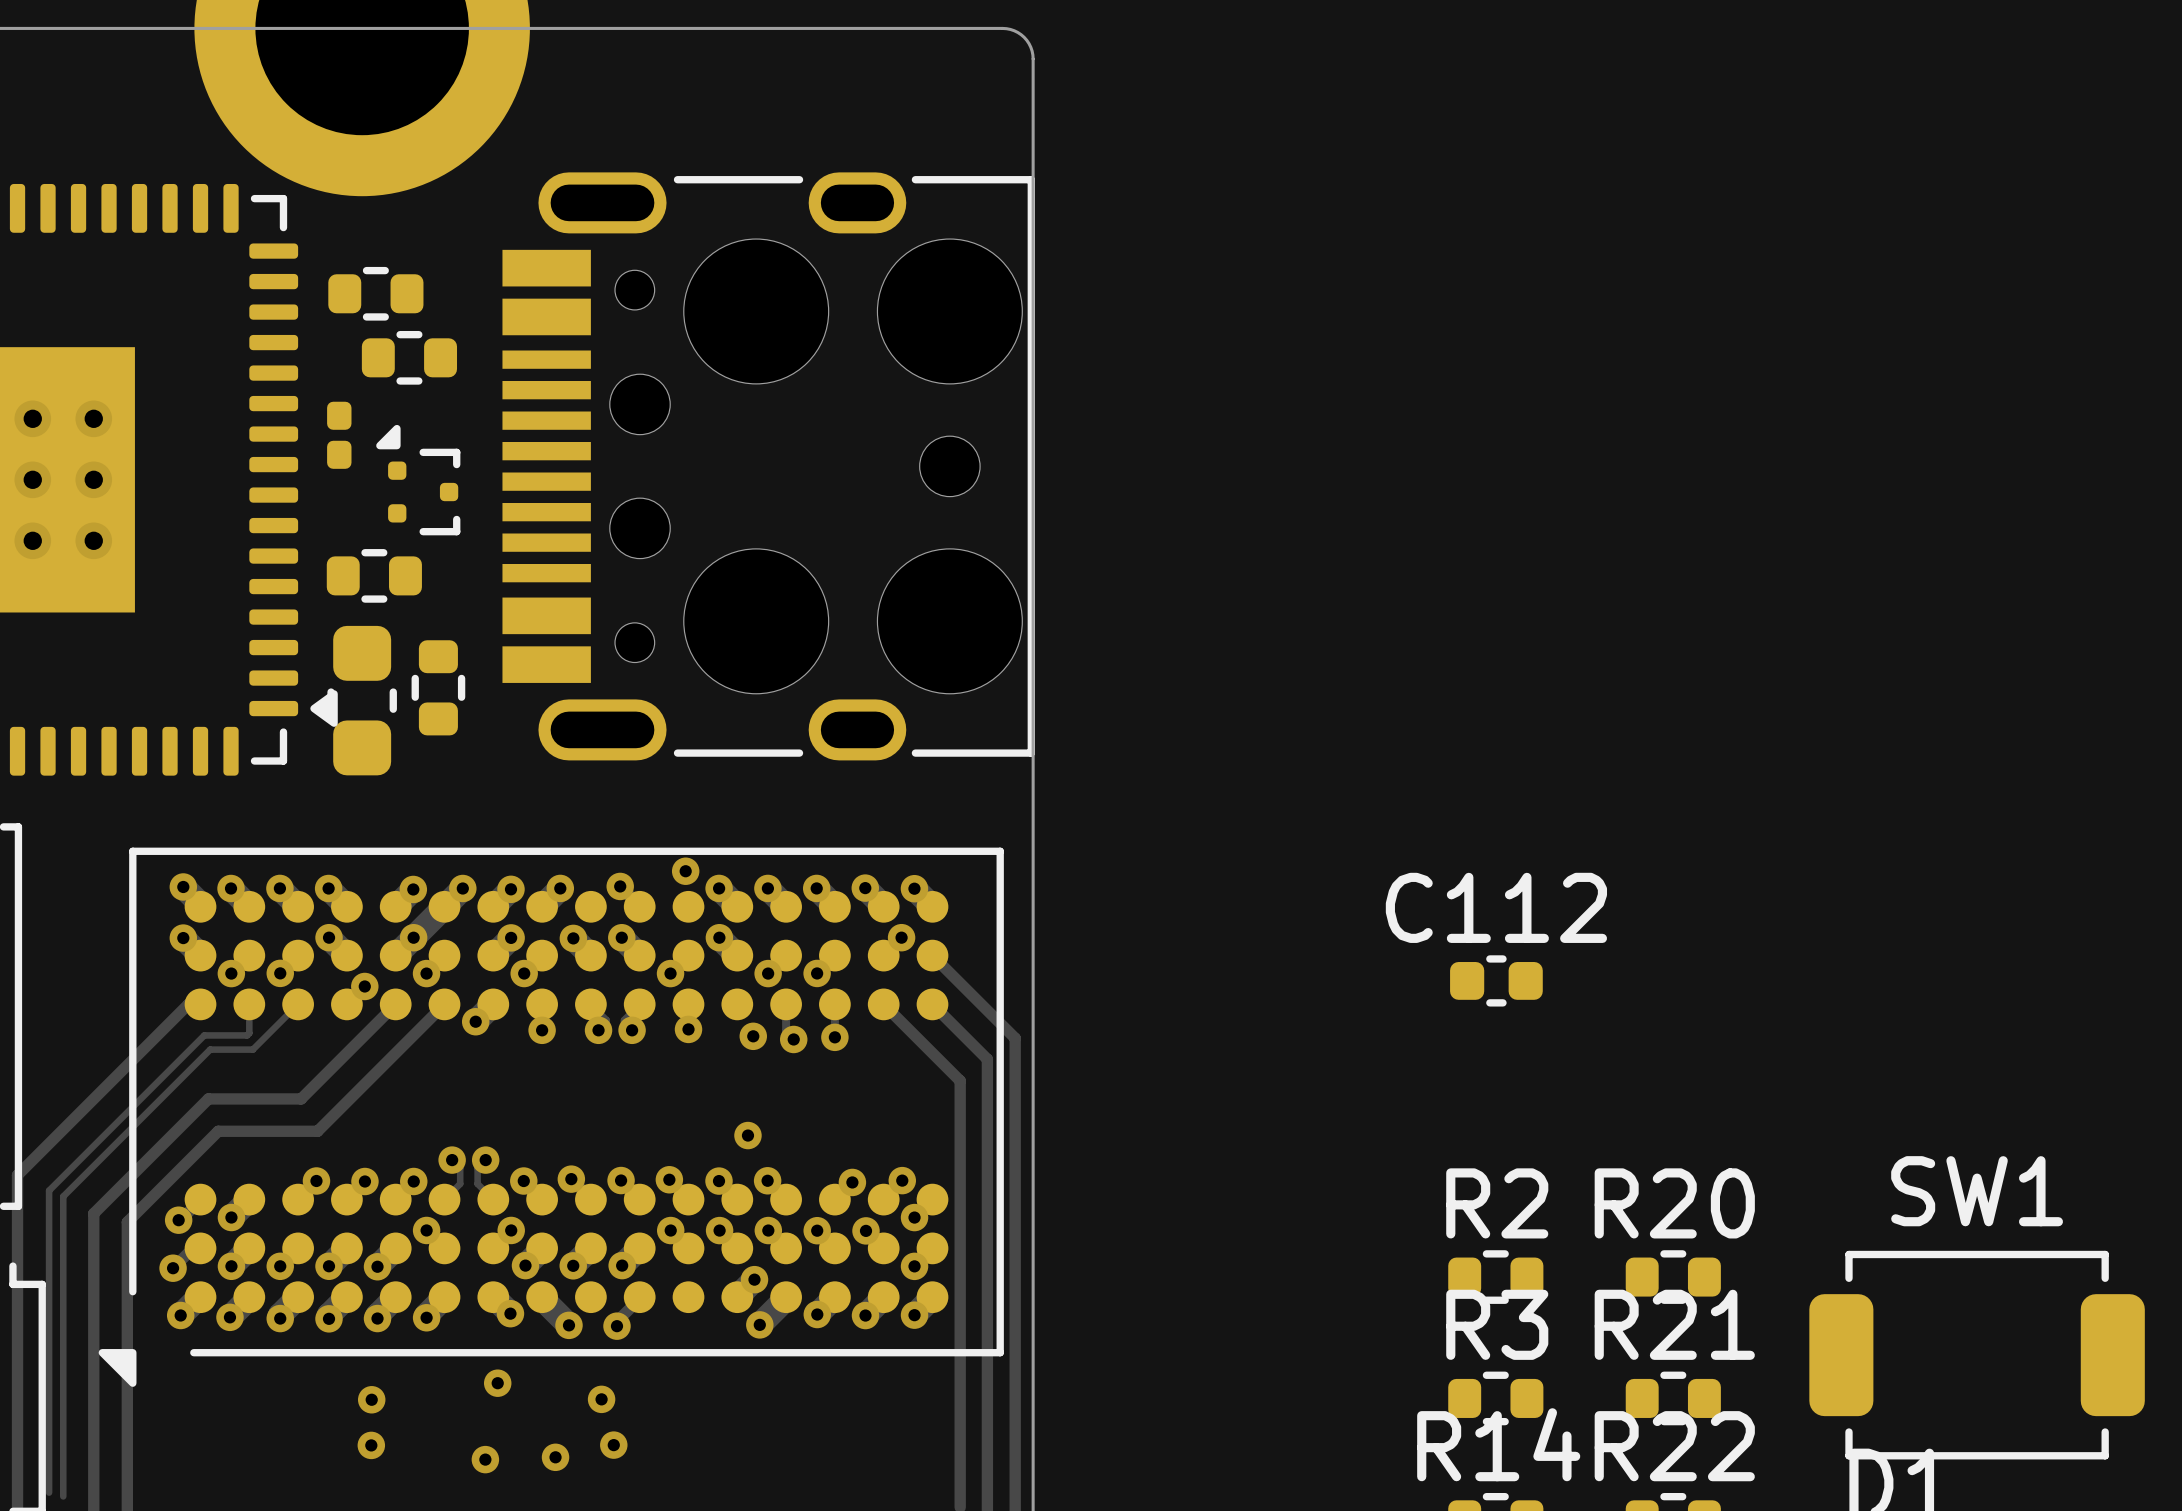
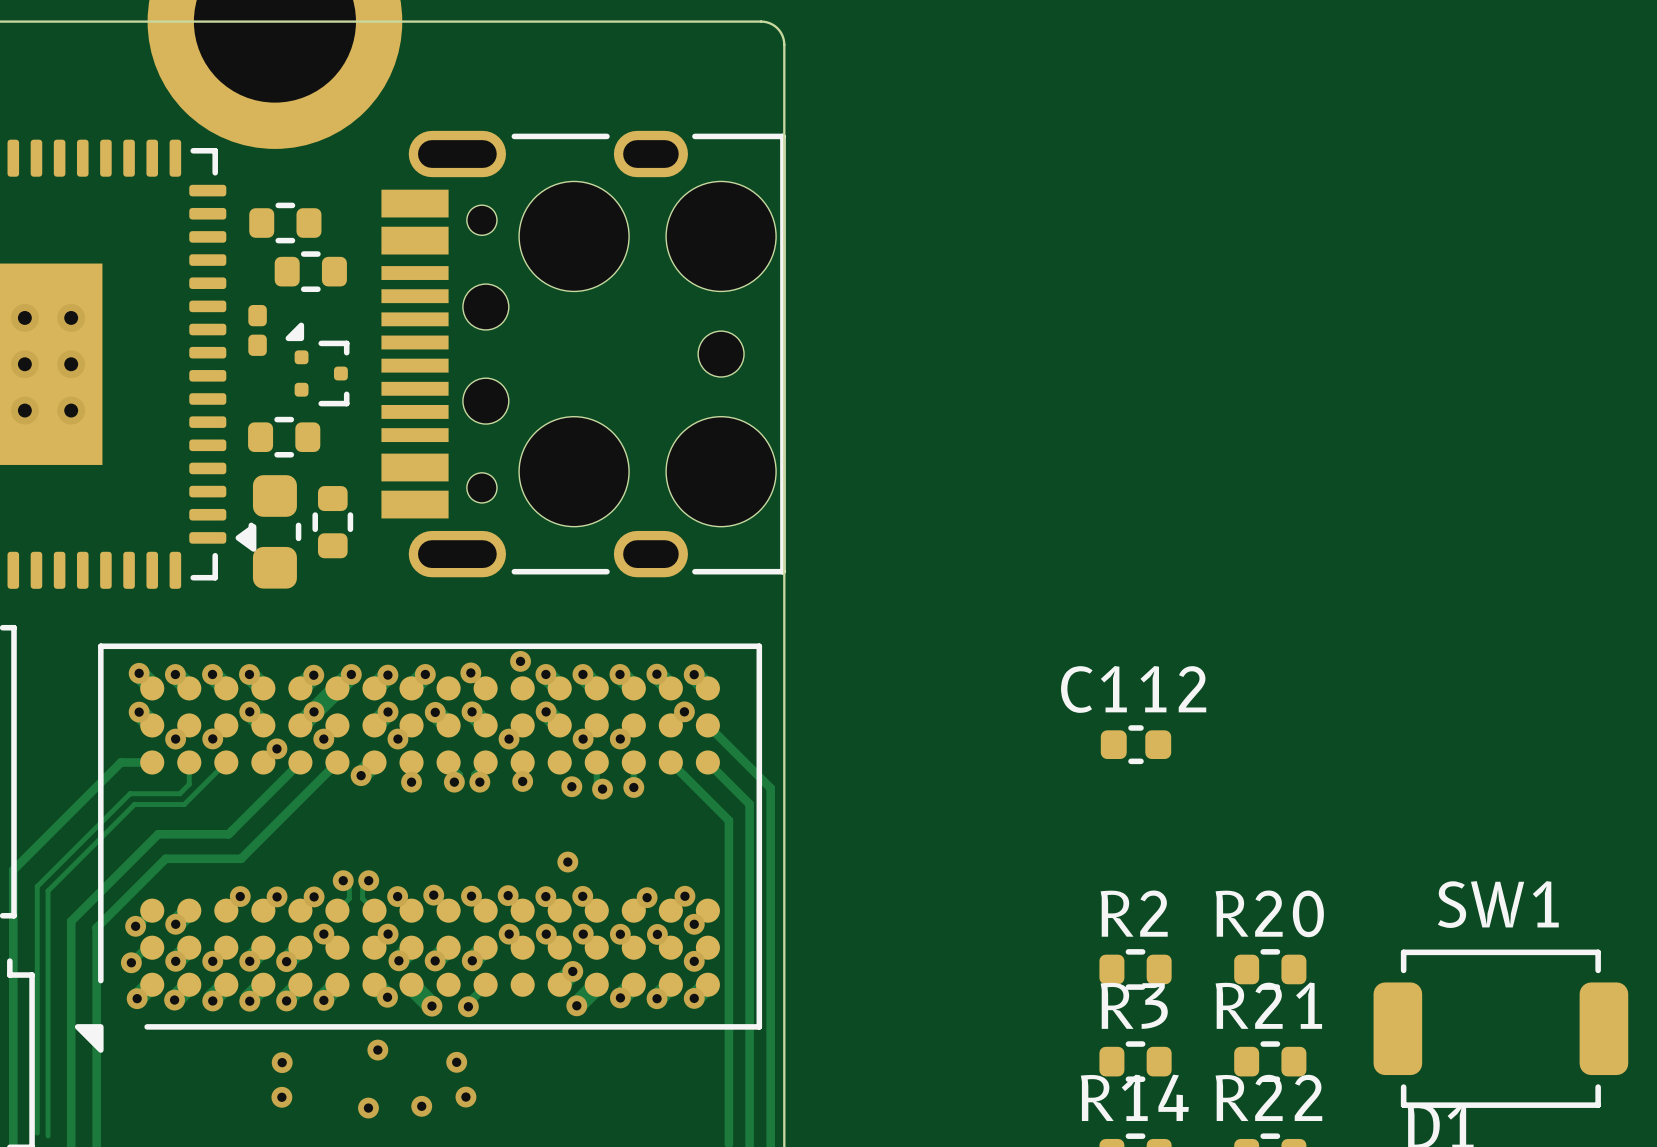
track: (188, 1004) (17, 1175) -> (142, 762) (120, 762) (13, 870) (13, 892)
track: (247, 1035) (204, 1035) (49, 1190) -> (187, 786) (179, 793) (130, 793) (37, 886) (37, 903)
track: (252, 1049) (210, 1049) (63, 1196) -> (191, 796) (184, 804) (134, 804) (48, 890) (48, 908)

